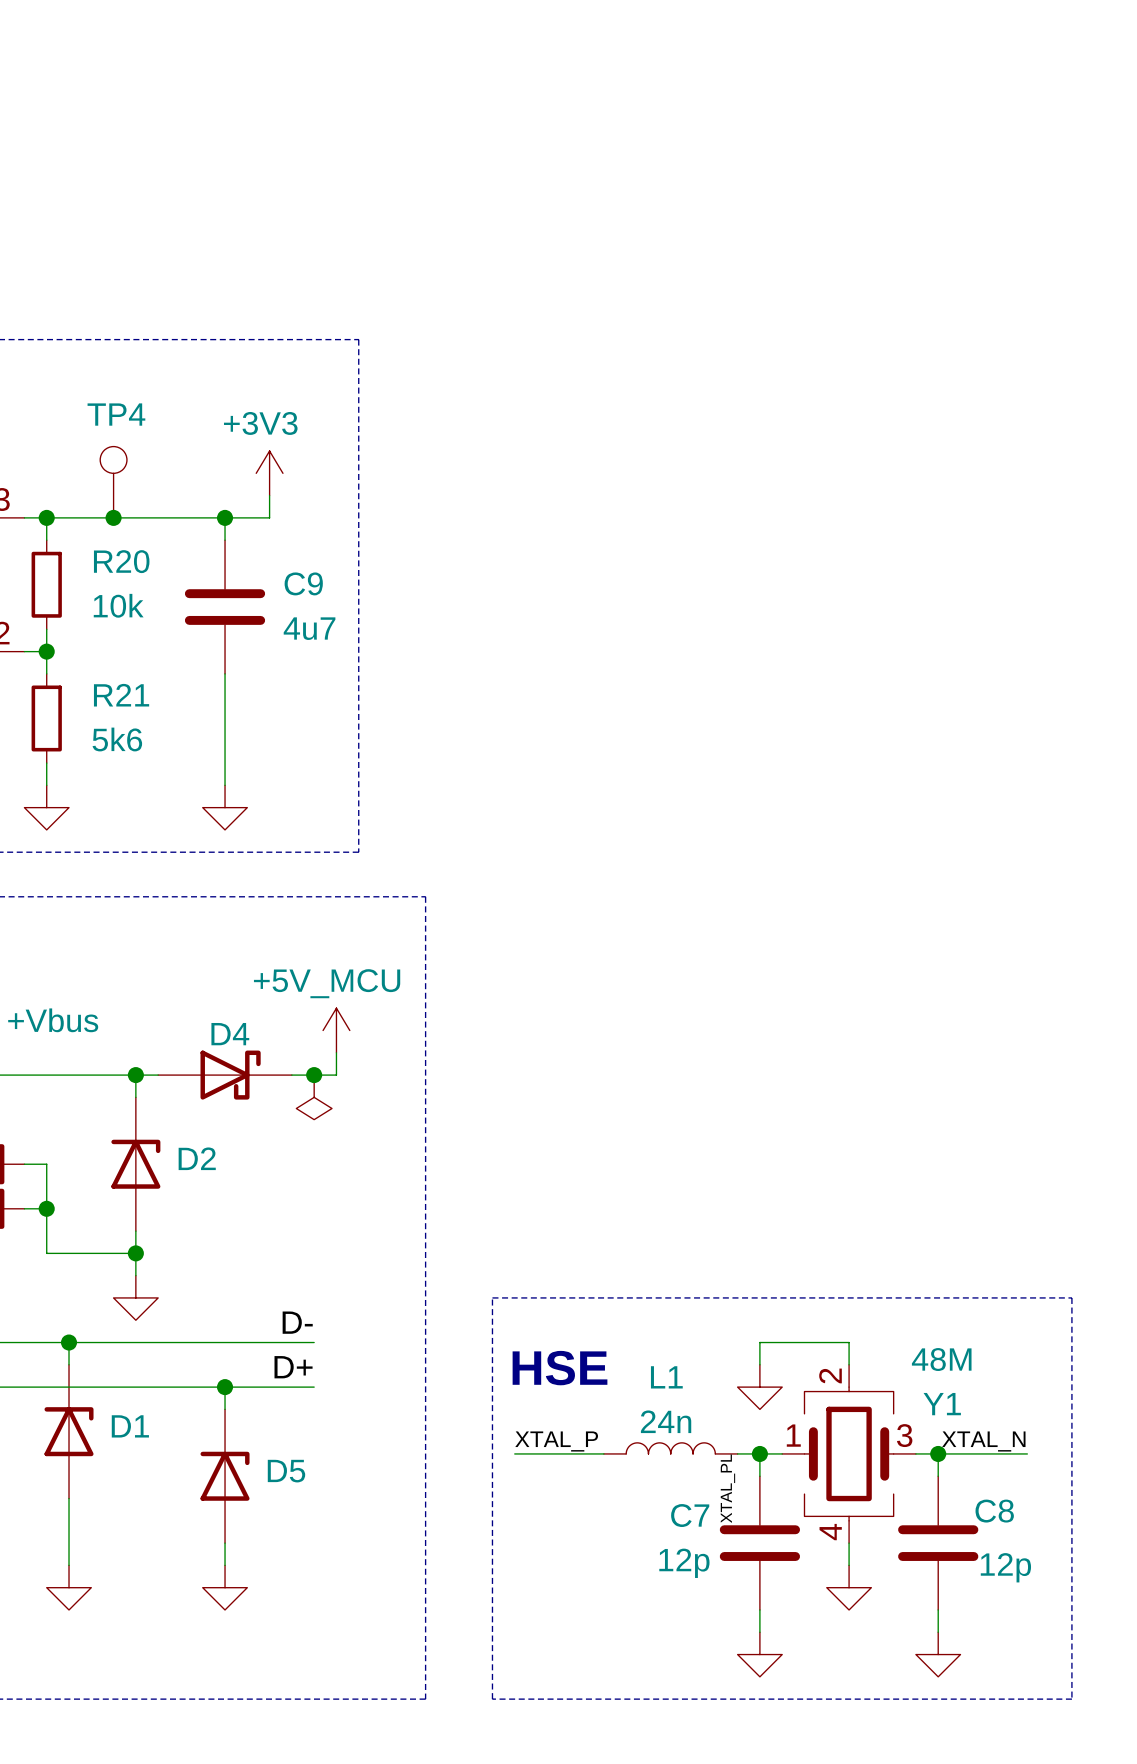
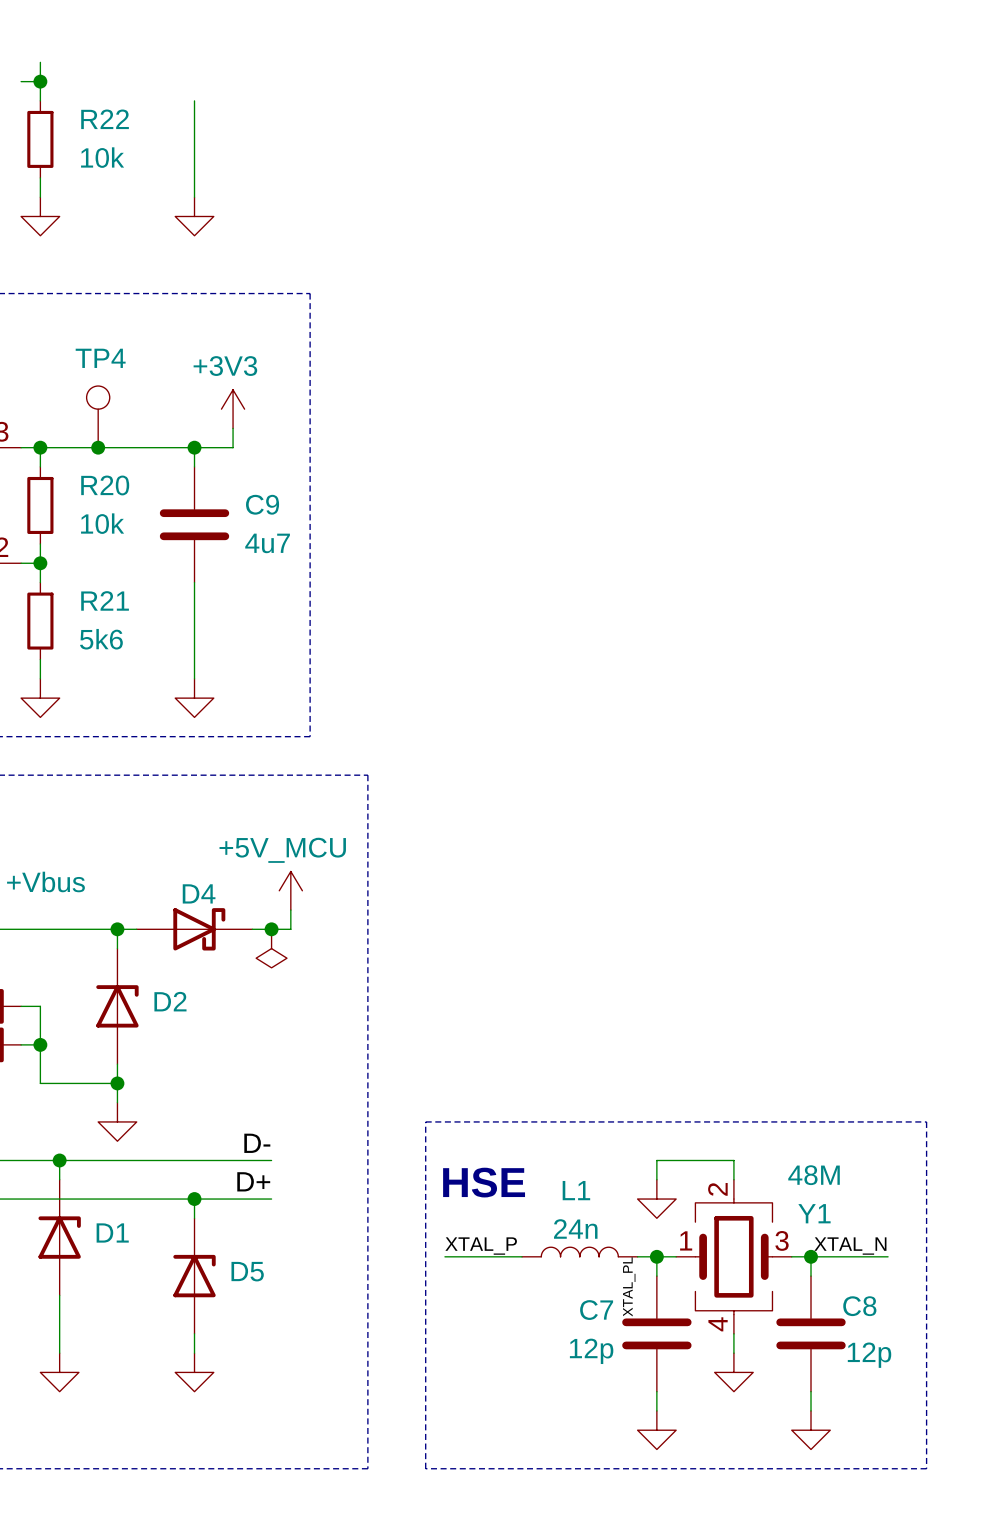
wire: none -> (40, 62) (40, 100)
wire: none -> (21, 81) (40, 81)
junction: none -> (40, 81)
wire: none -> (194, 100) (194, 197)
R22: none -> 10k (40, 139)
wire: none -> (40, 177) (40, 197)
power symbol: none -> (40, 216)
power symbol: none -> (194, 216)

